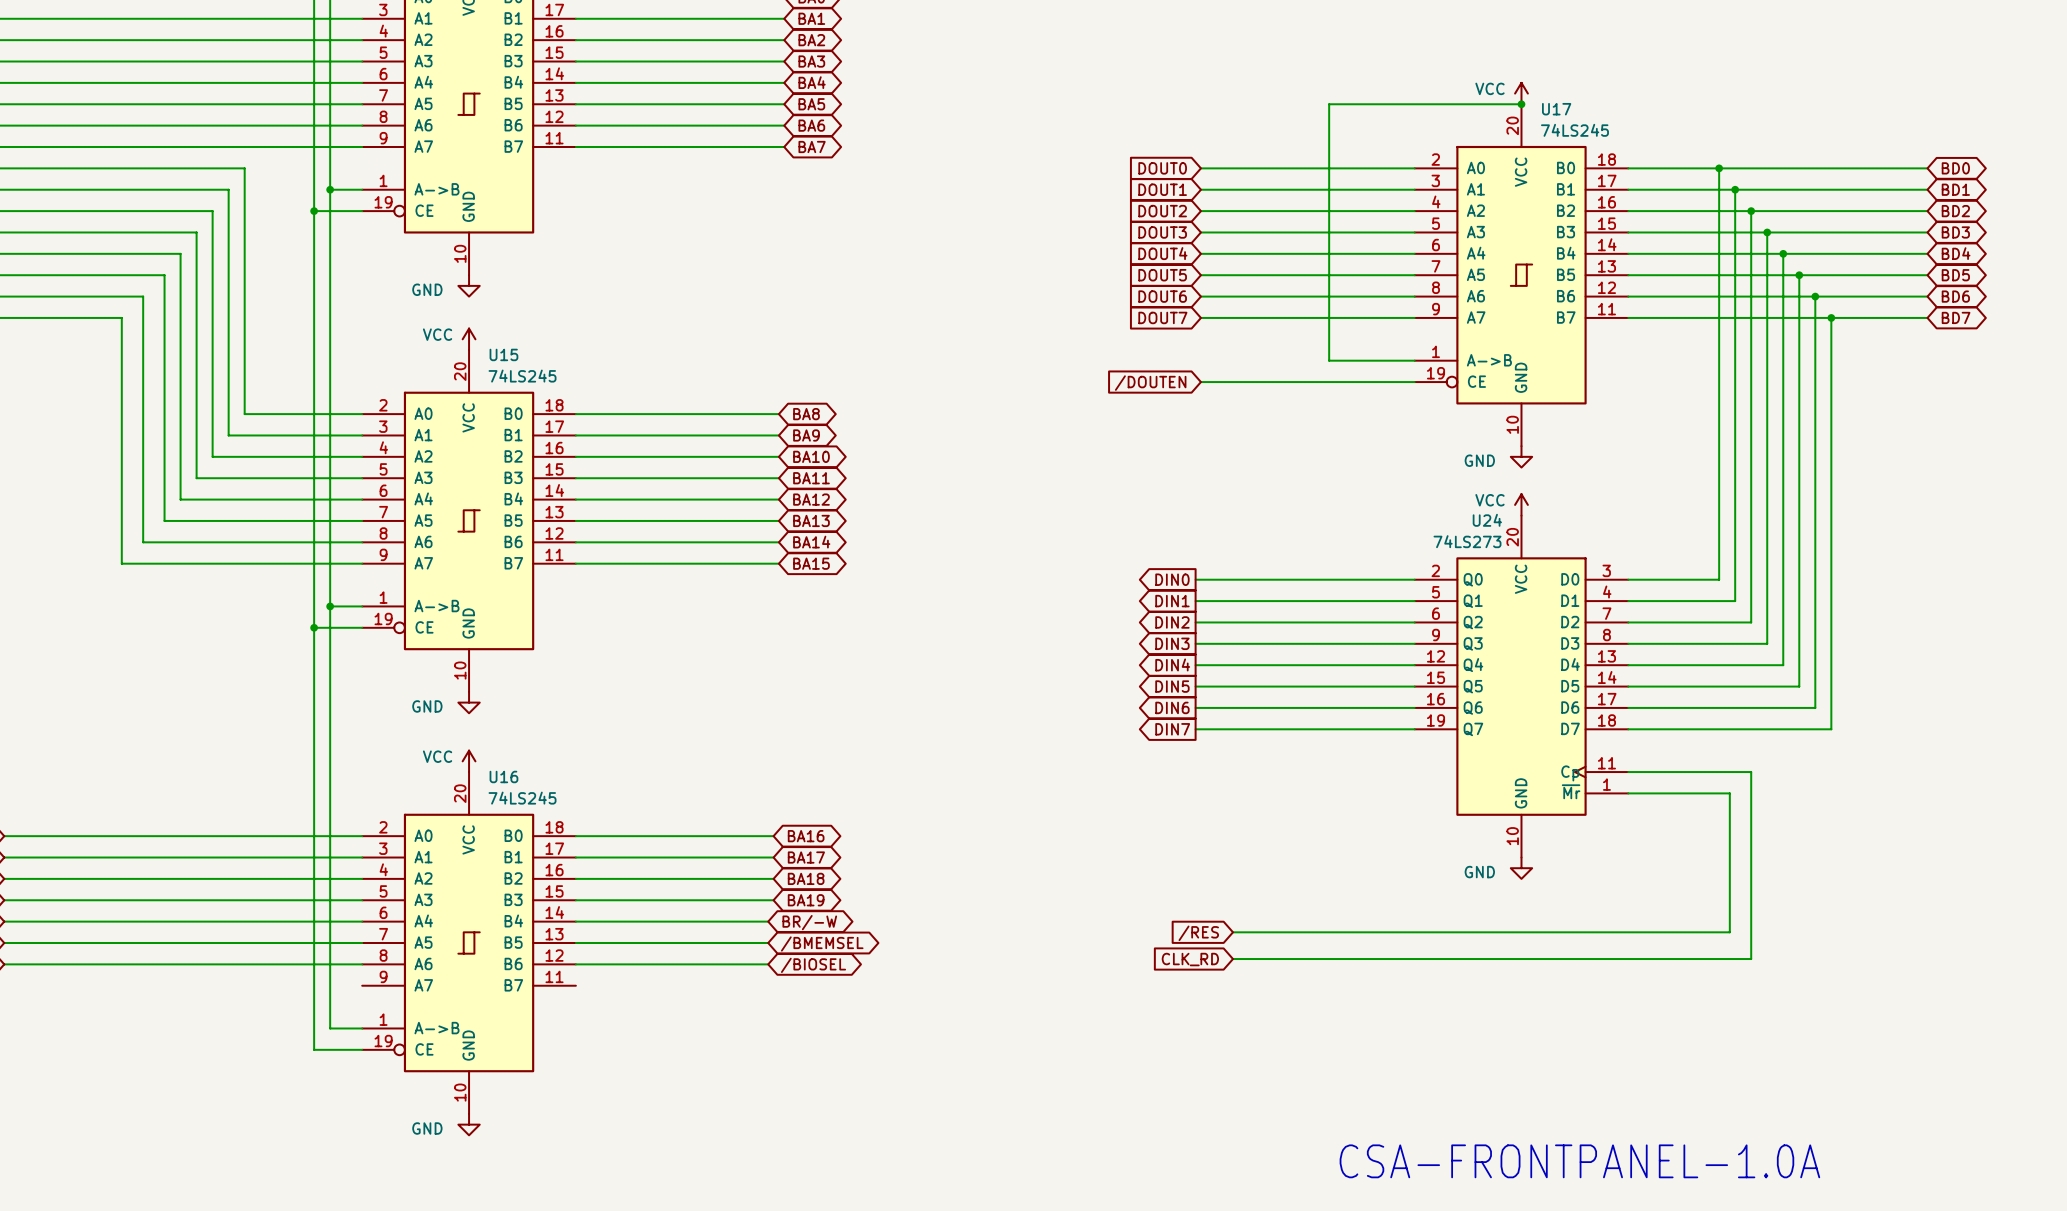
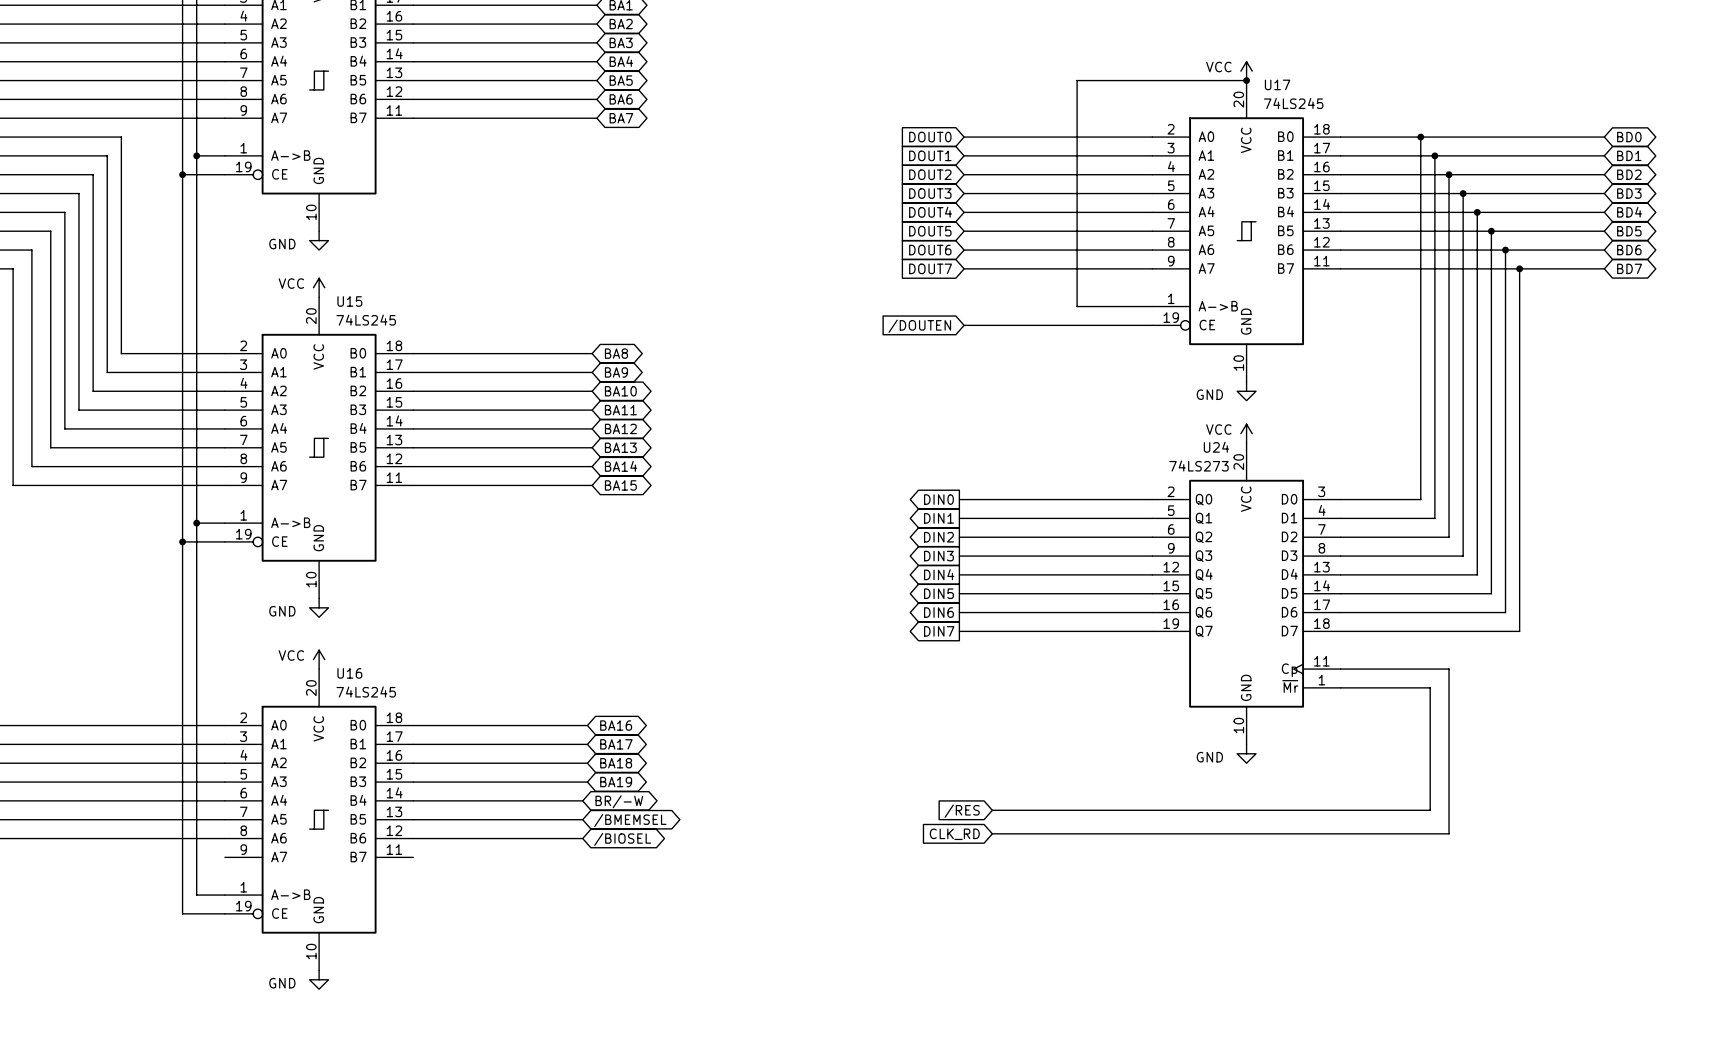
text: CSA-FRONTPANEL-1.0A (1579, 1161) -> none

